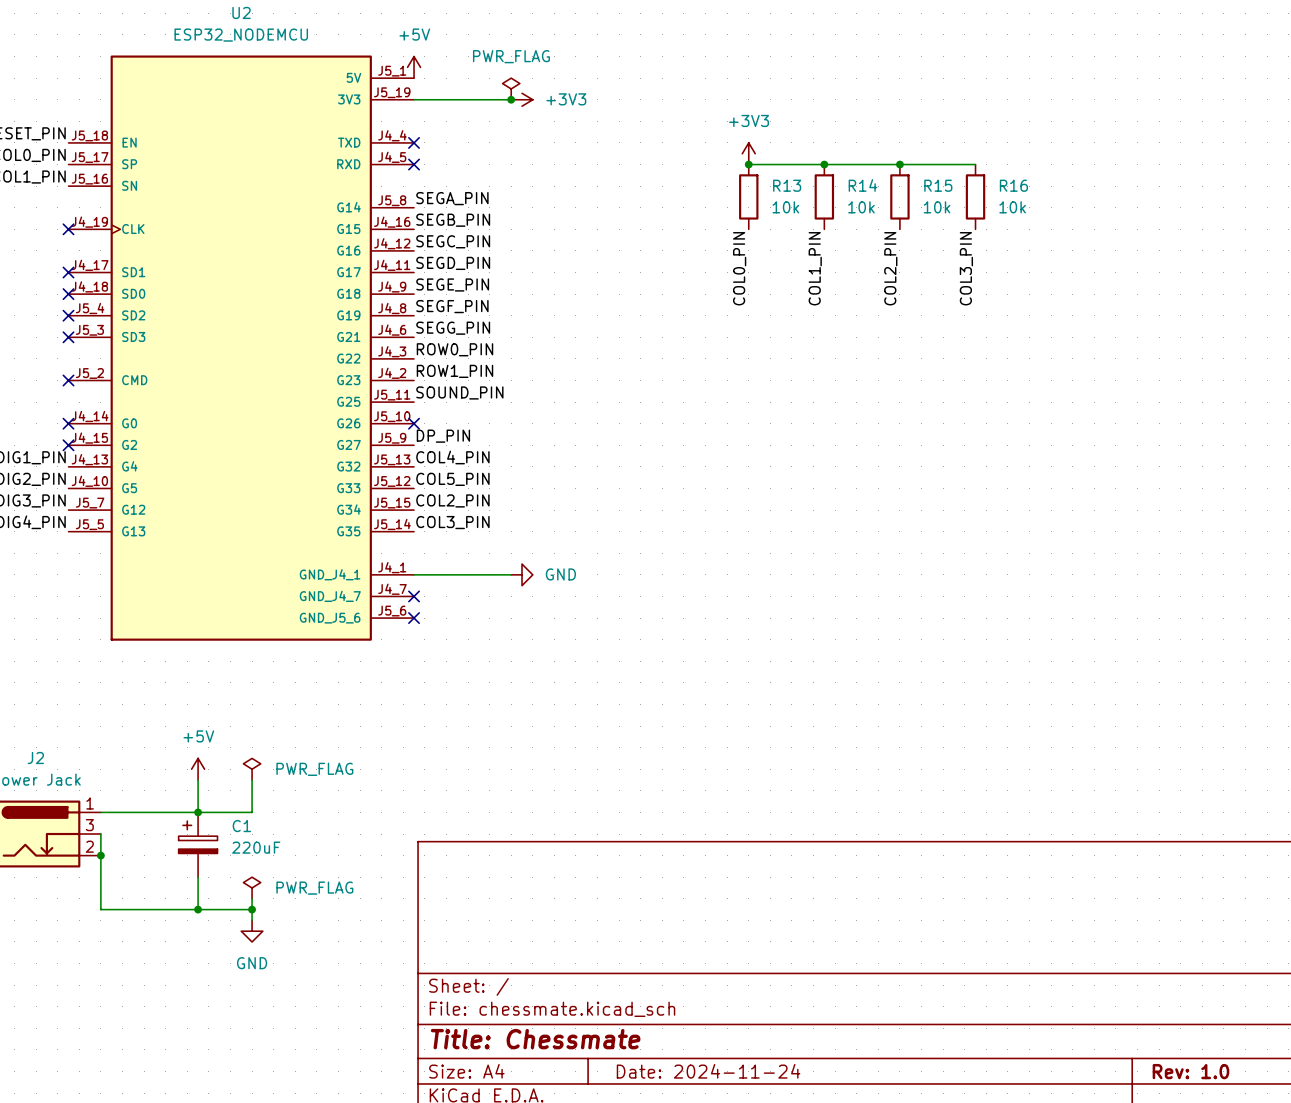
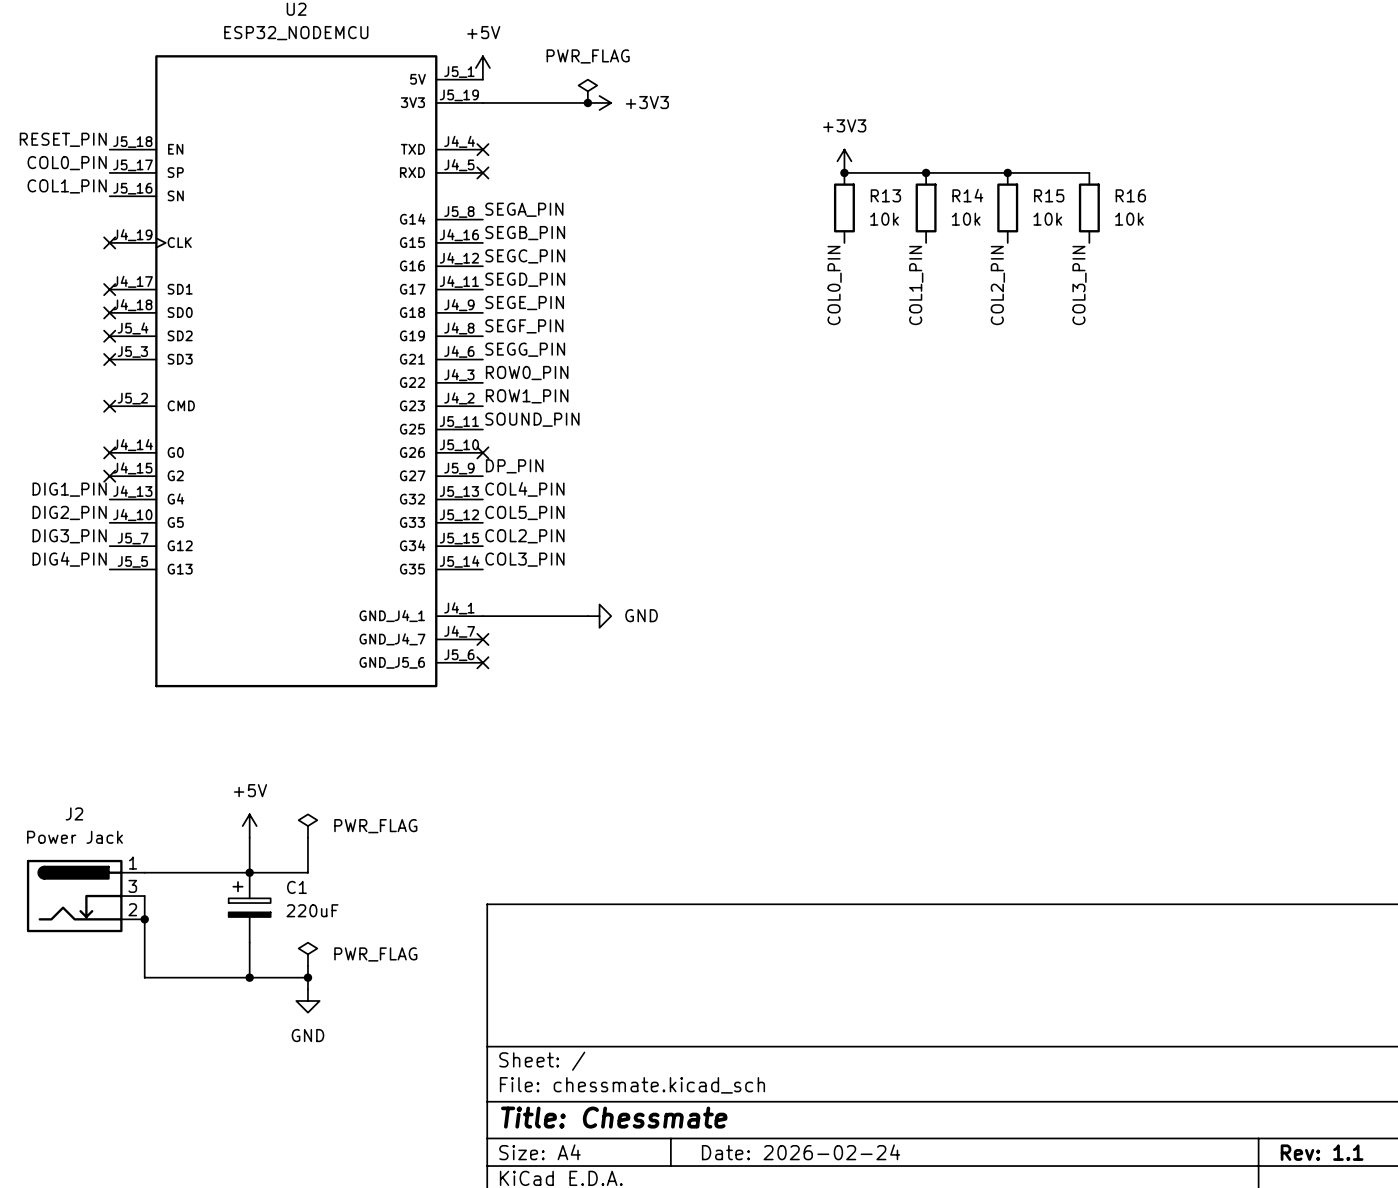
title block: Date: 2024-11-24 (708, 1071) -> Date: 2026-02-24 (801, 1152)
title block: Rev: 1.0 (1190, 1071) -> Rev: 1.1 (1322, 1152)

